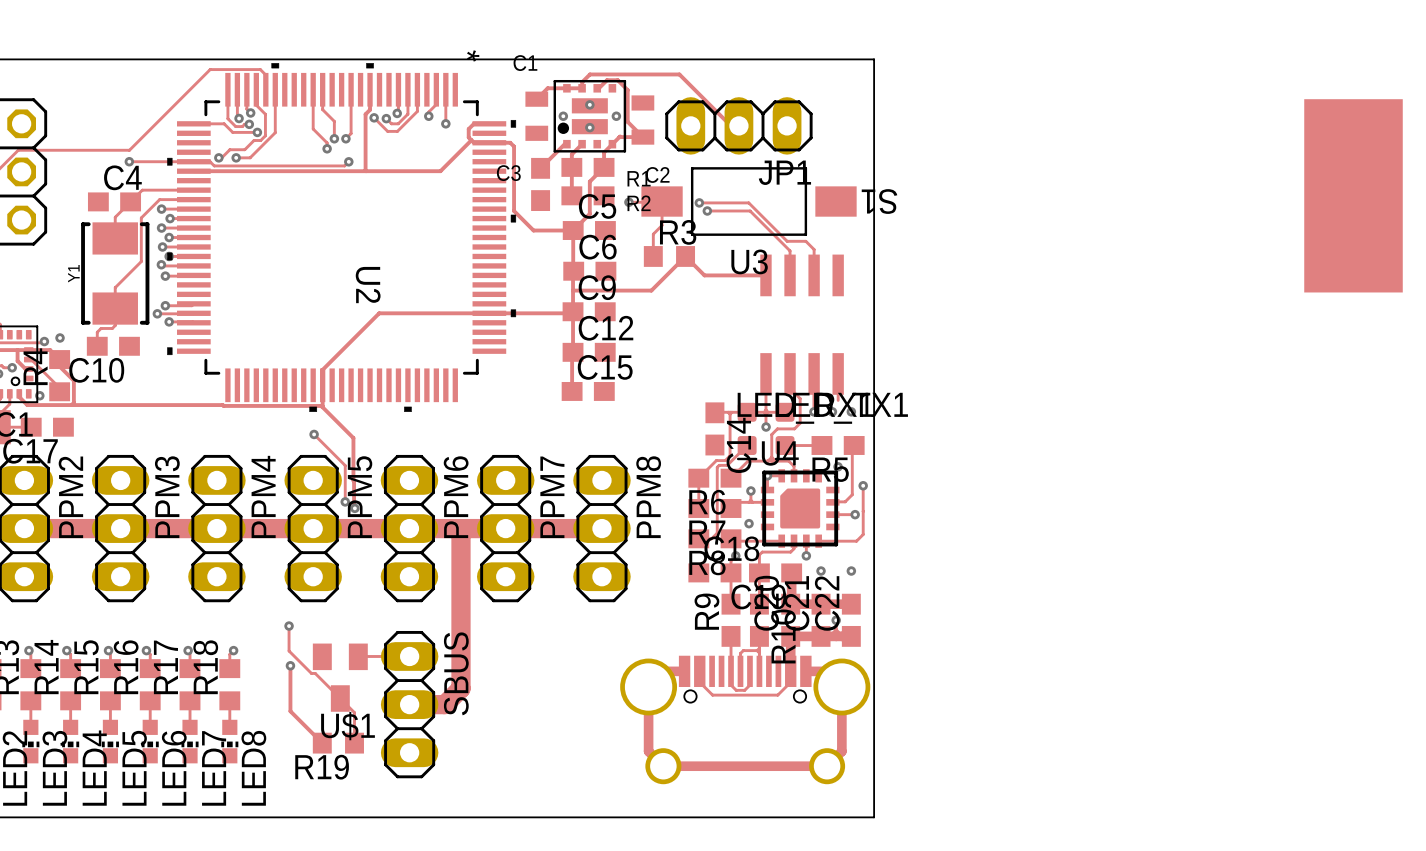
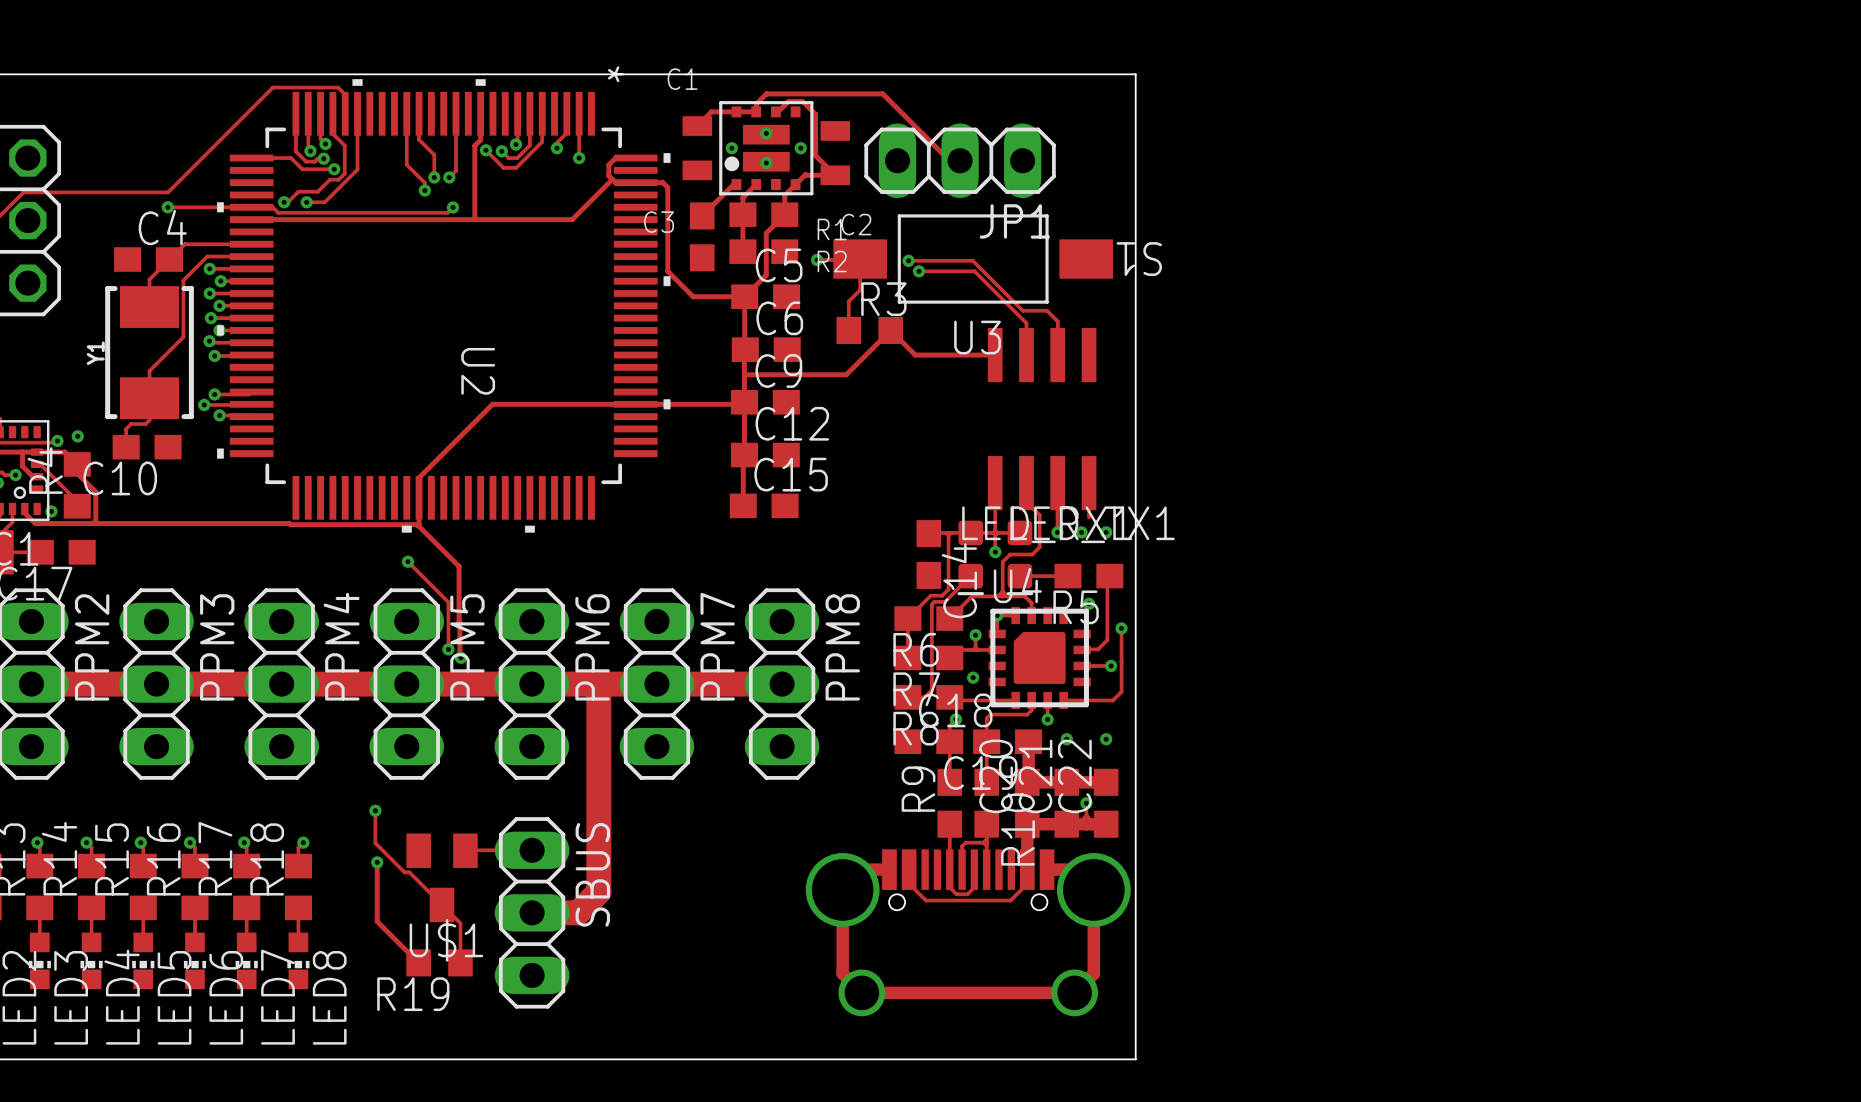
drawing: [1304, 99, 1403, 293] -> none

